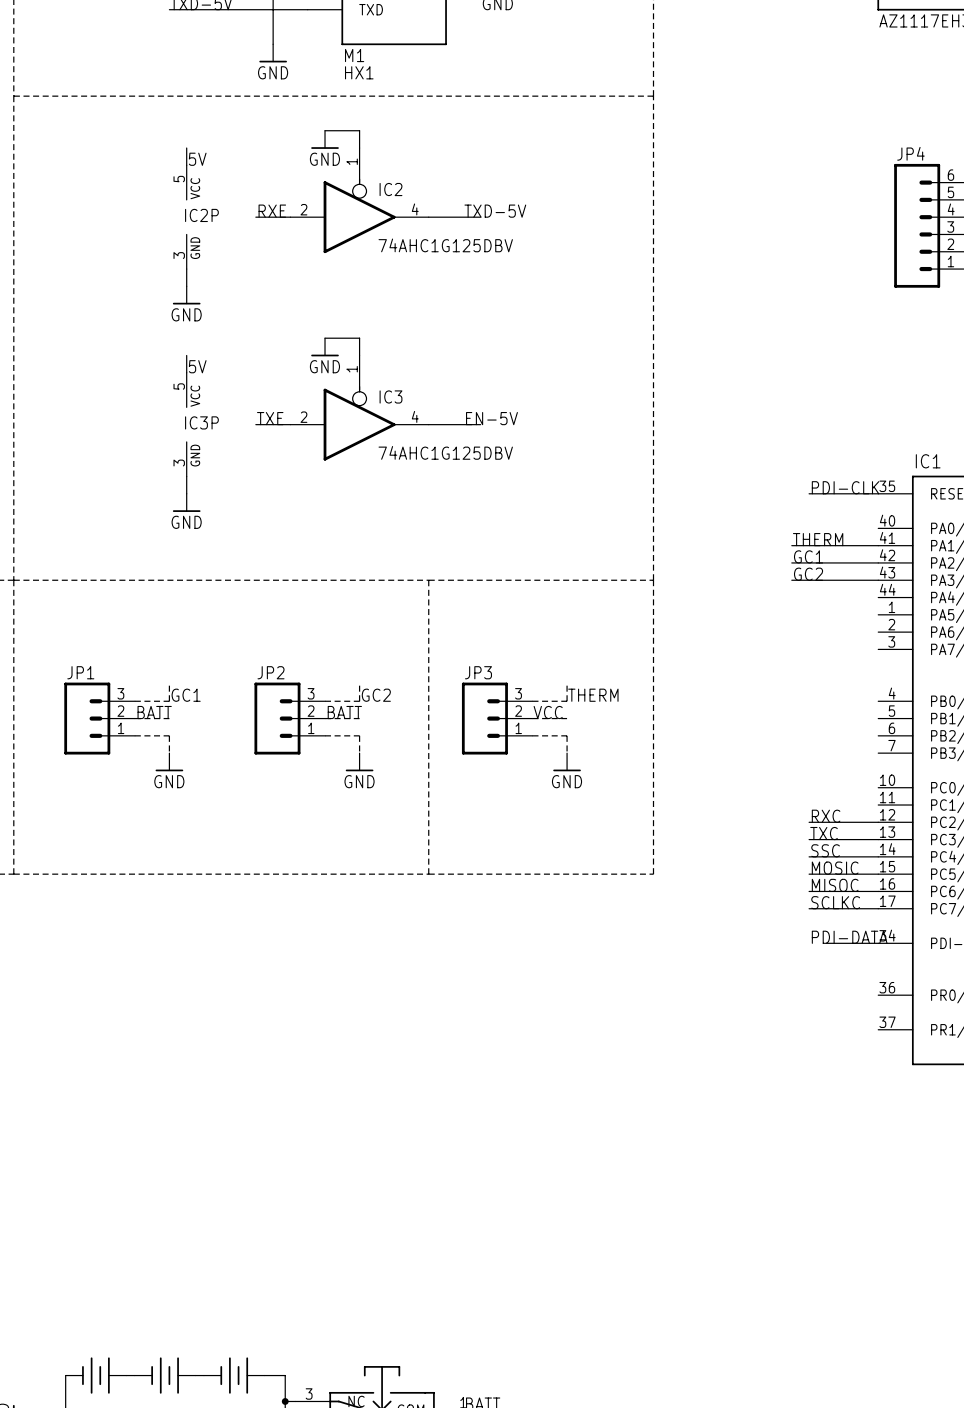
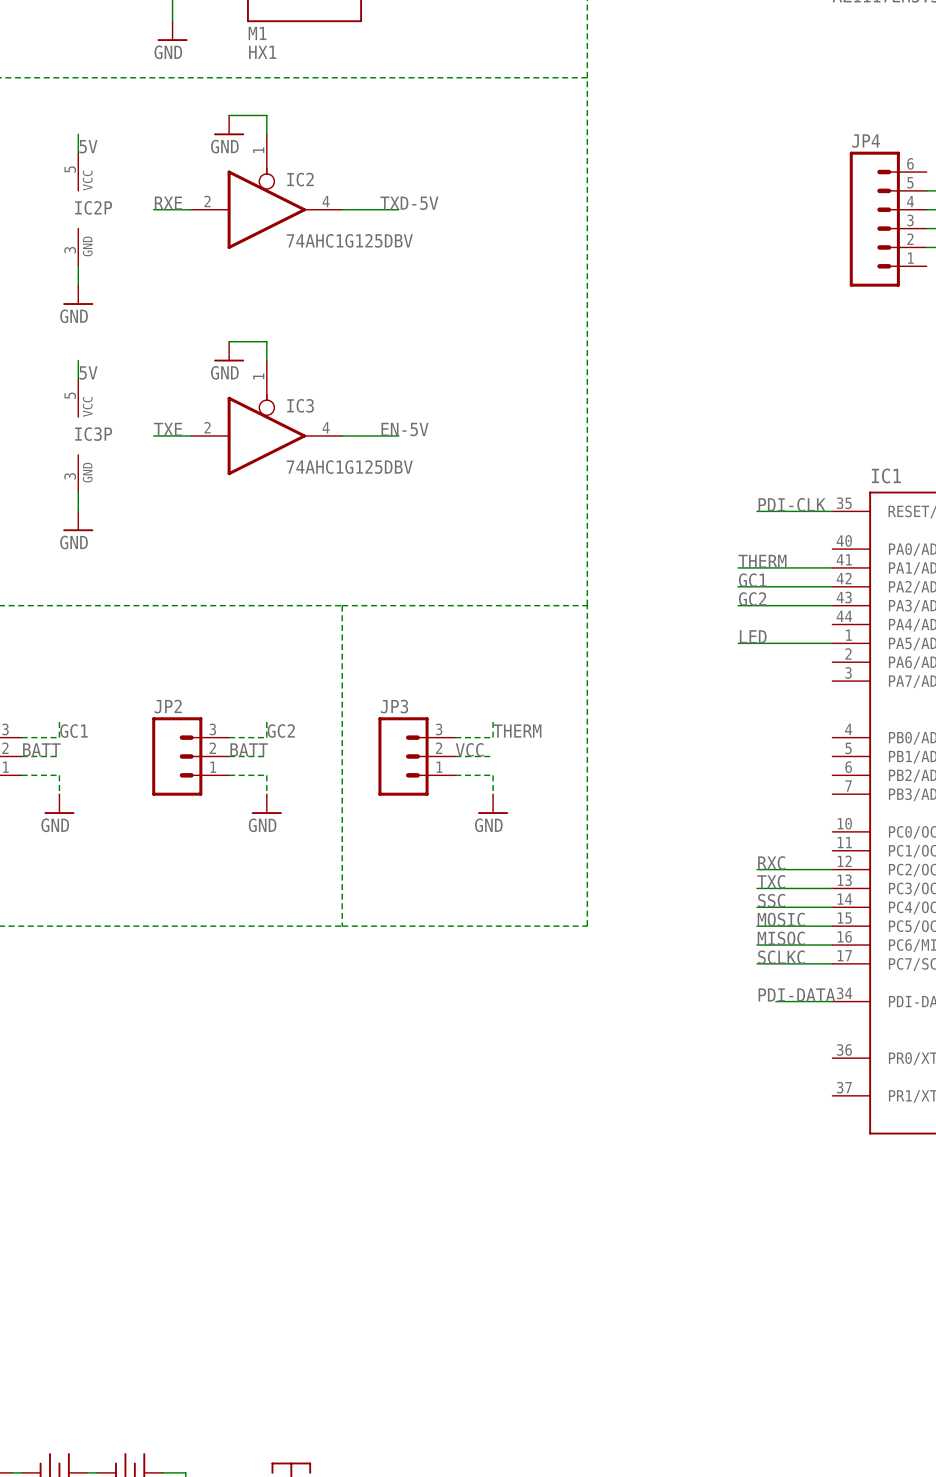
label: none -> LED (753, 636)
wire: none -> (738, 643) (832, 643)

